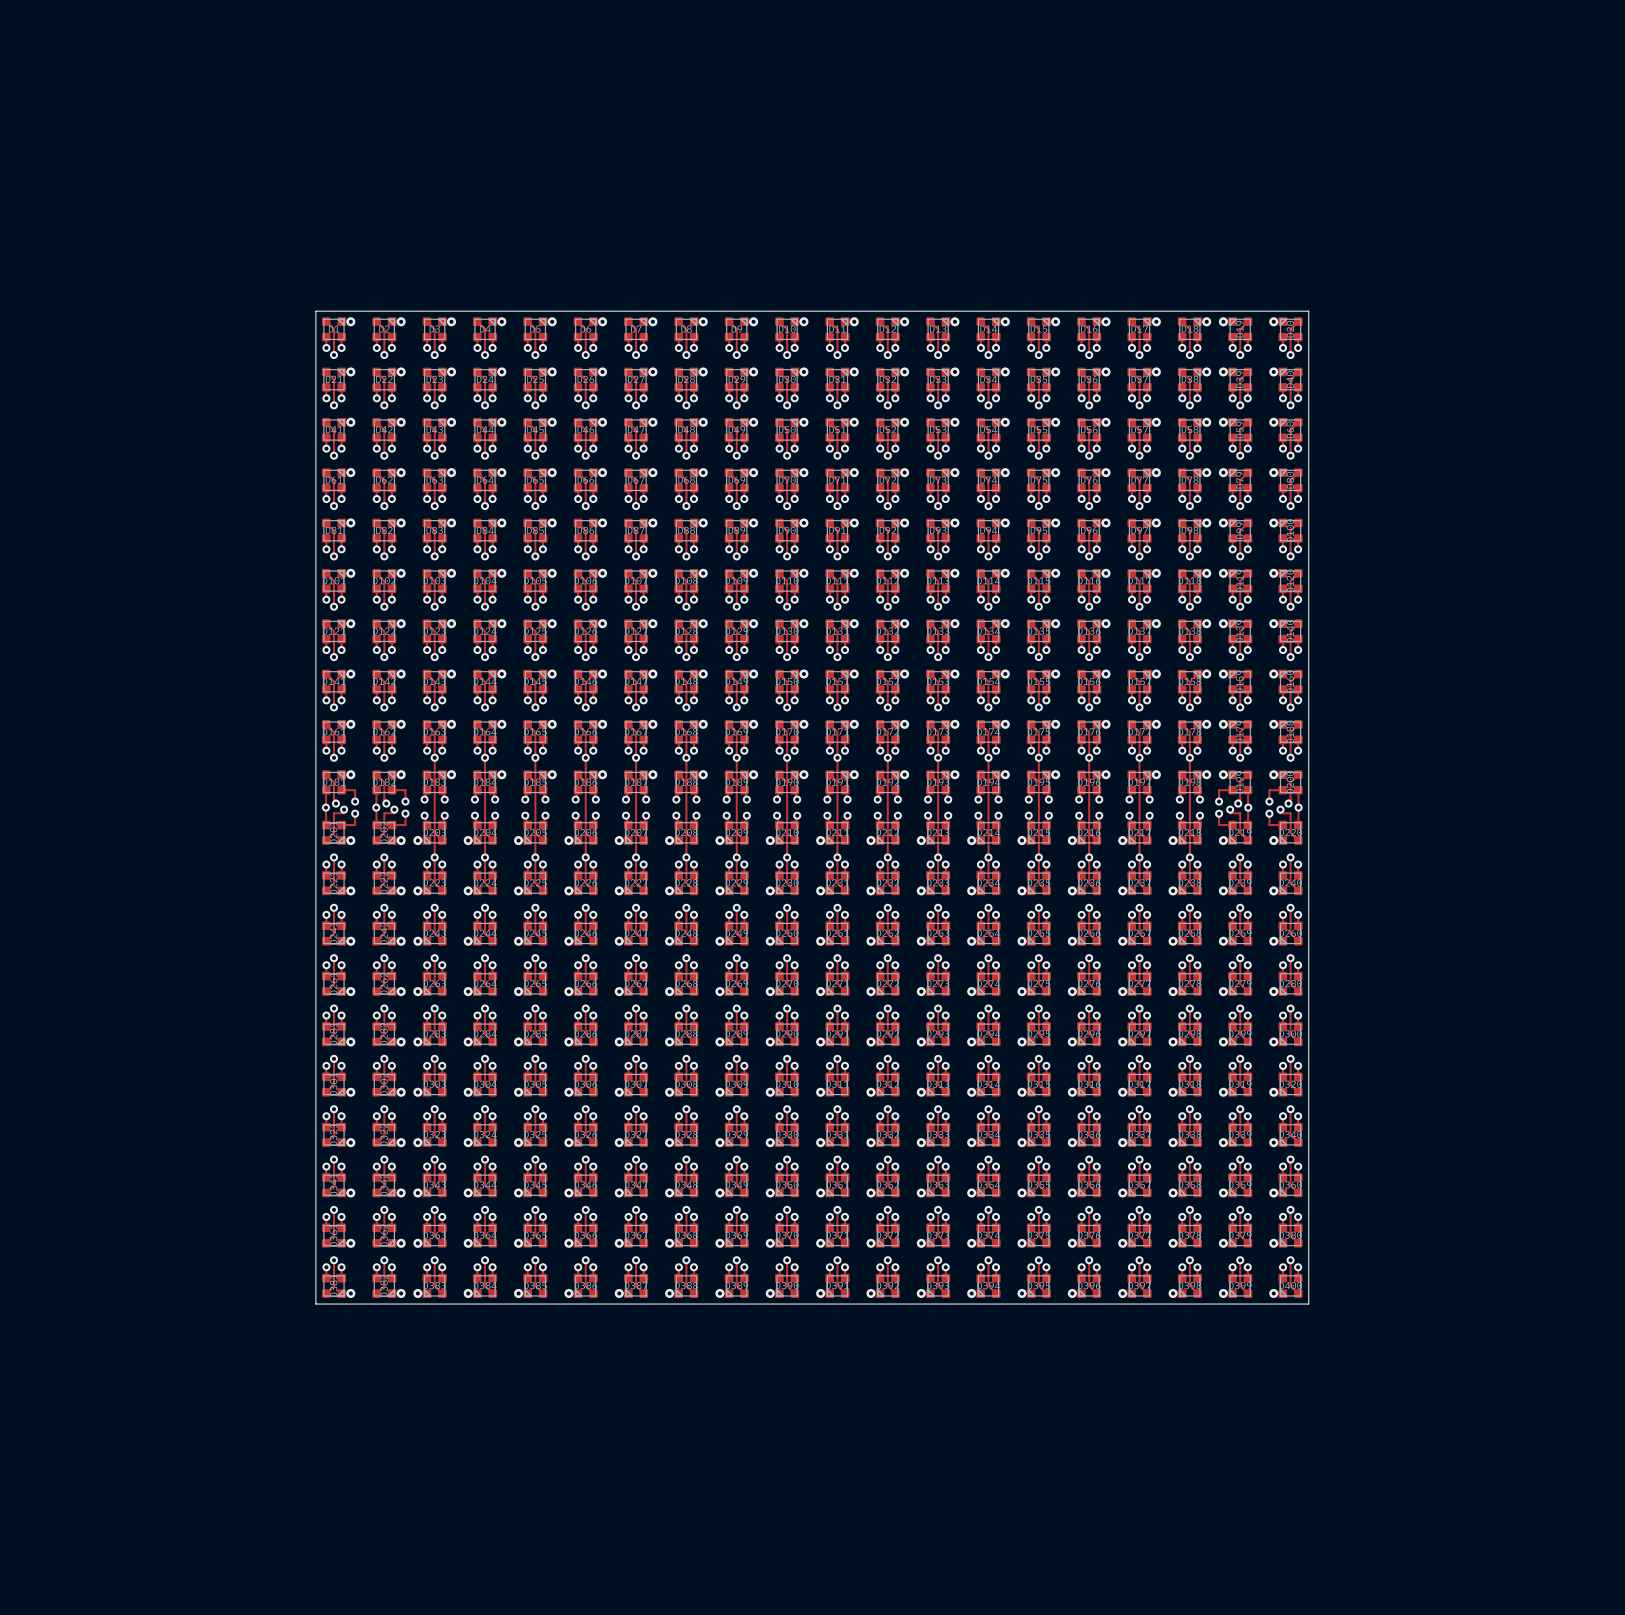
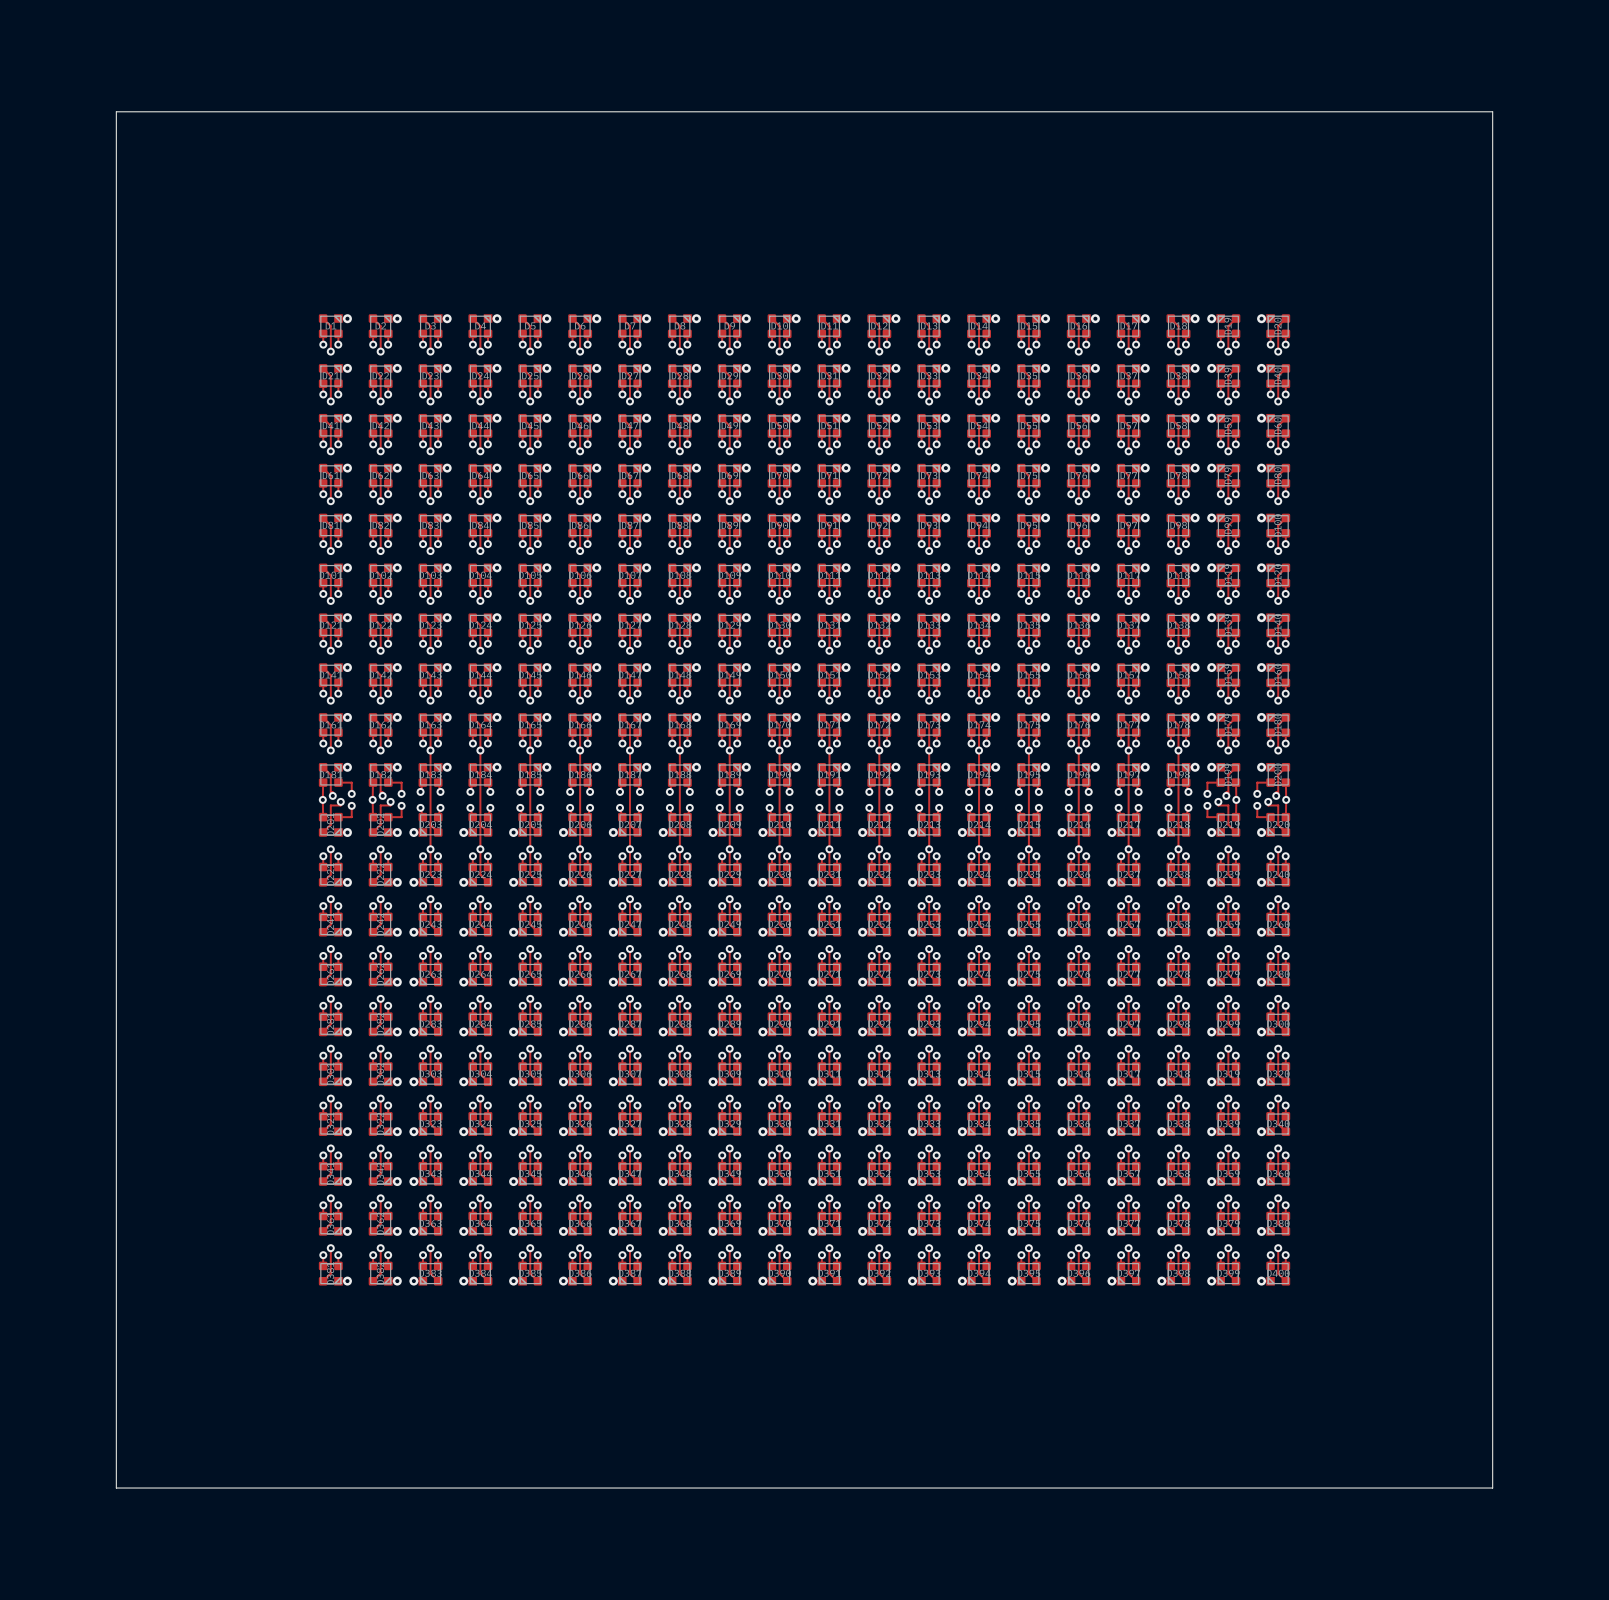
board edge: (315, 311) (1308, 311) (1308, 1304) (315, 1304) (315, 311) -> (116, 111) (116, 1488) (1492, 1488) (1492, 111) (116, 111)

